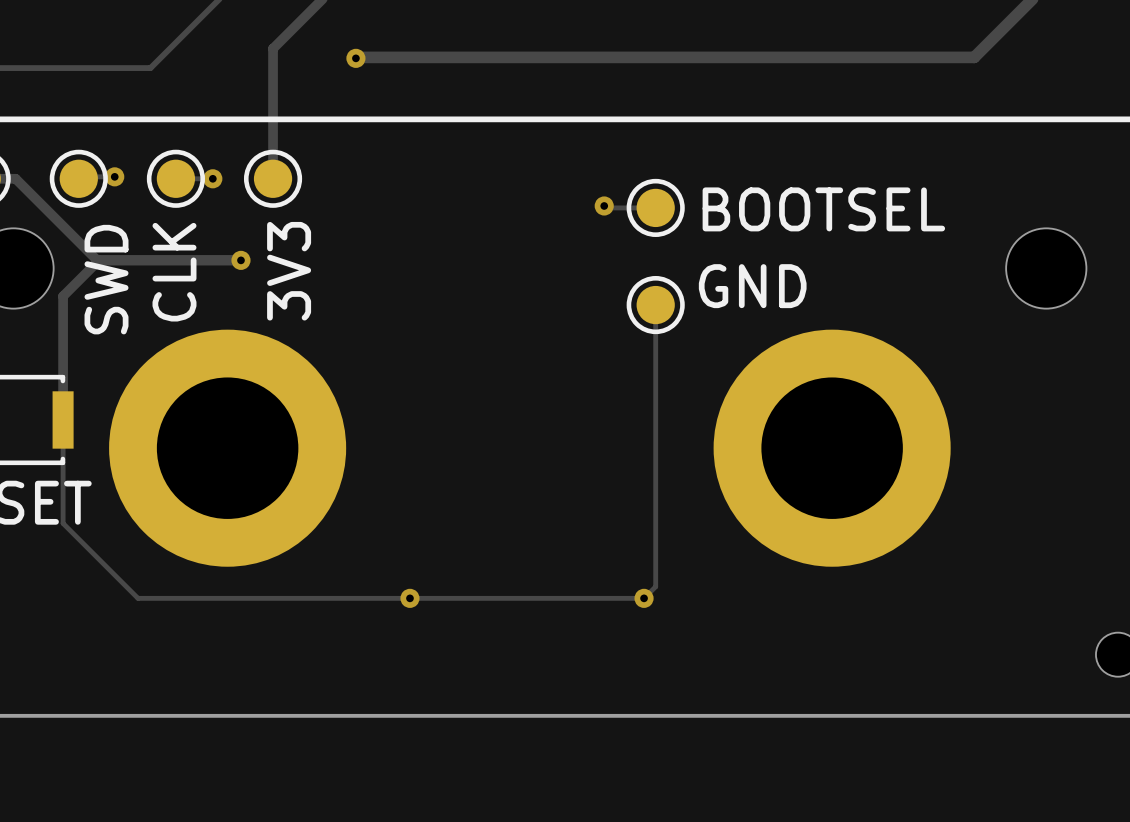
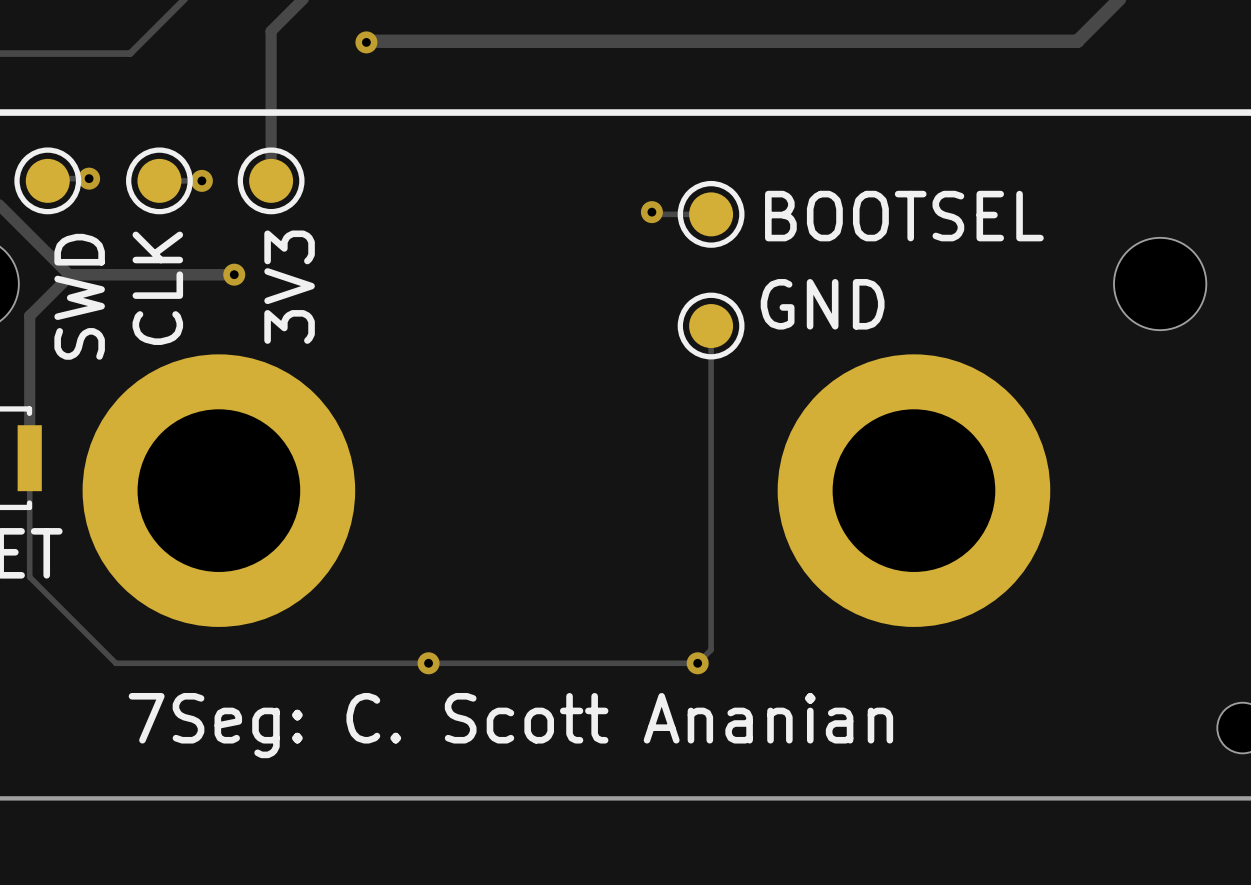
text: none -> 7Seg: C. Scott Ananian (510, 725)

